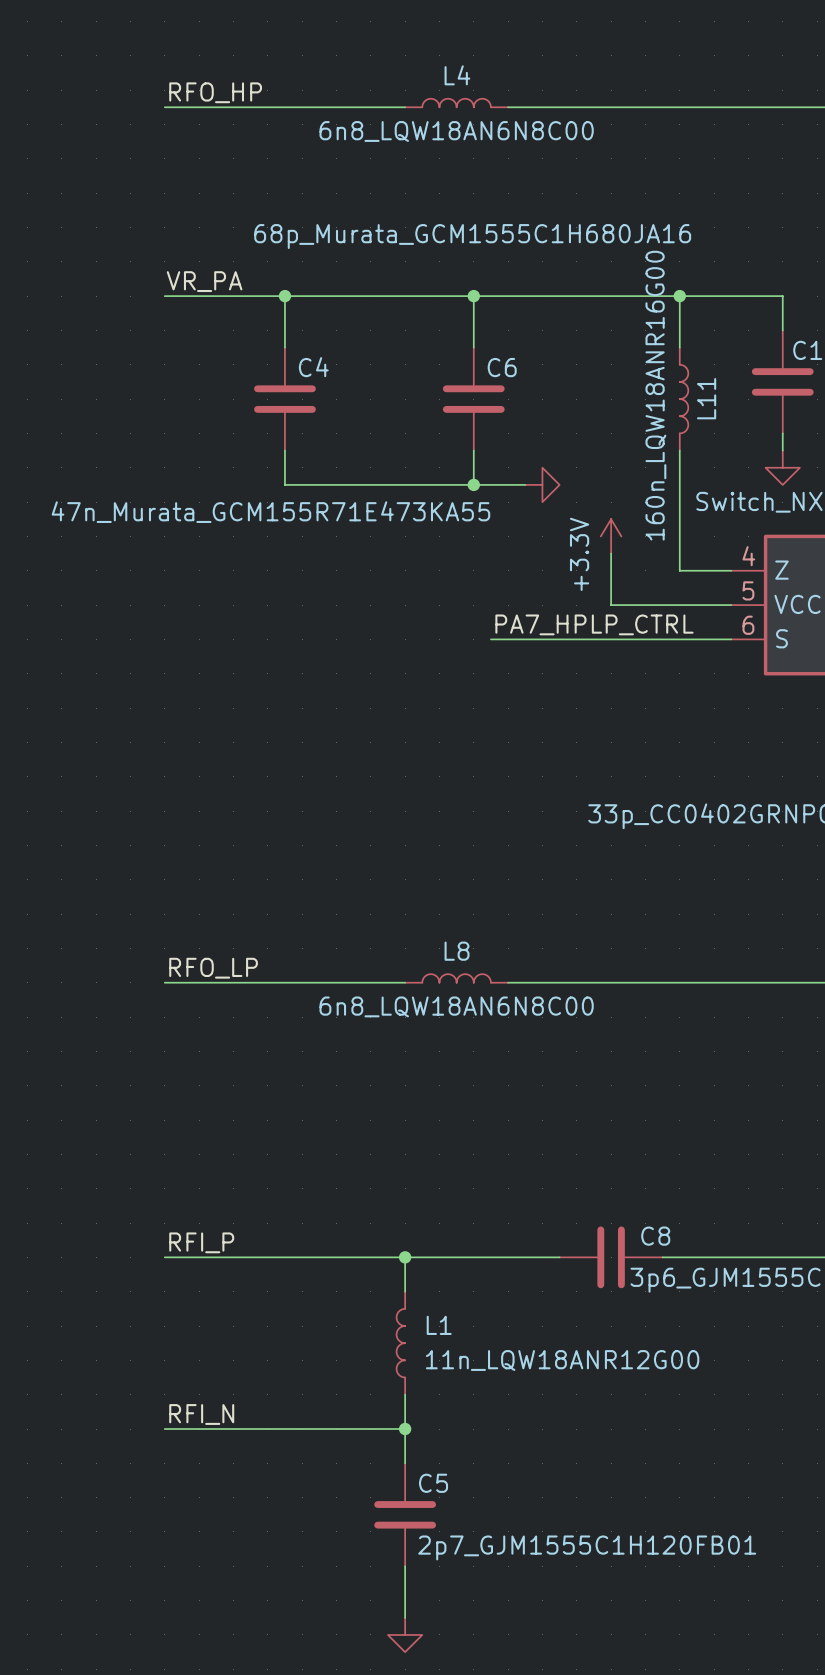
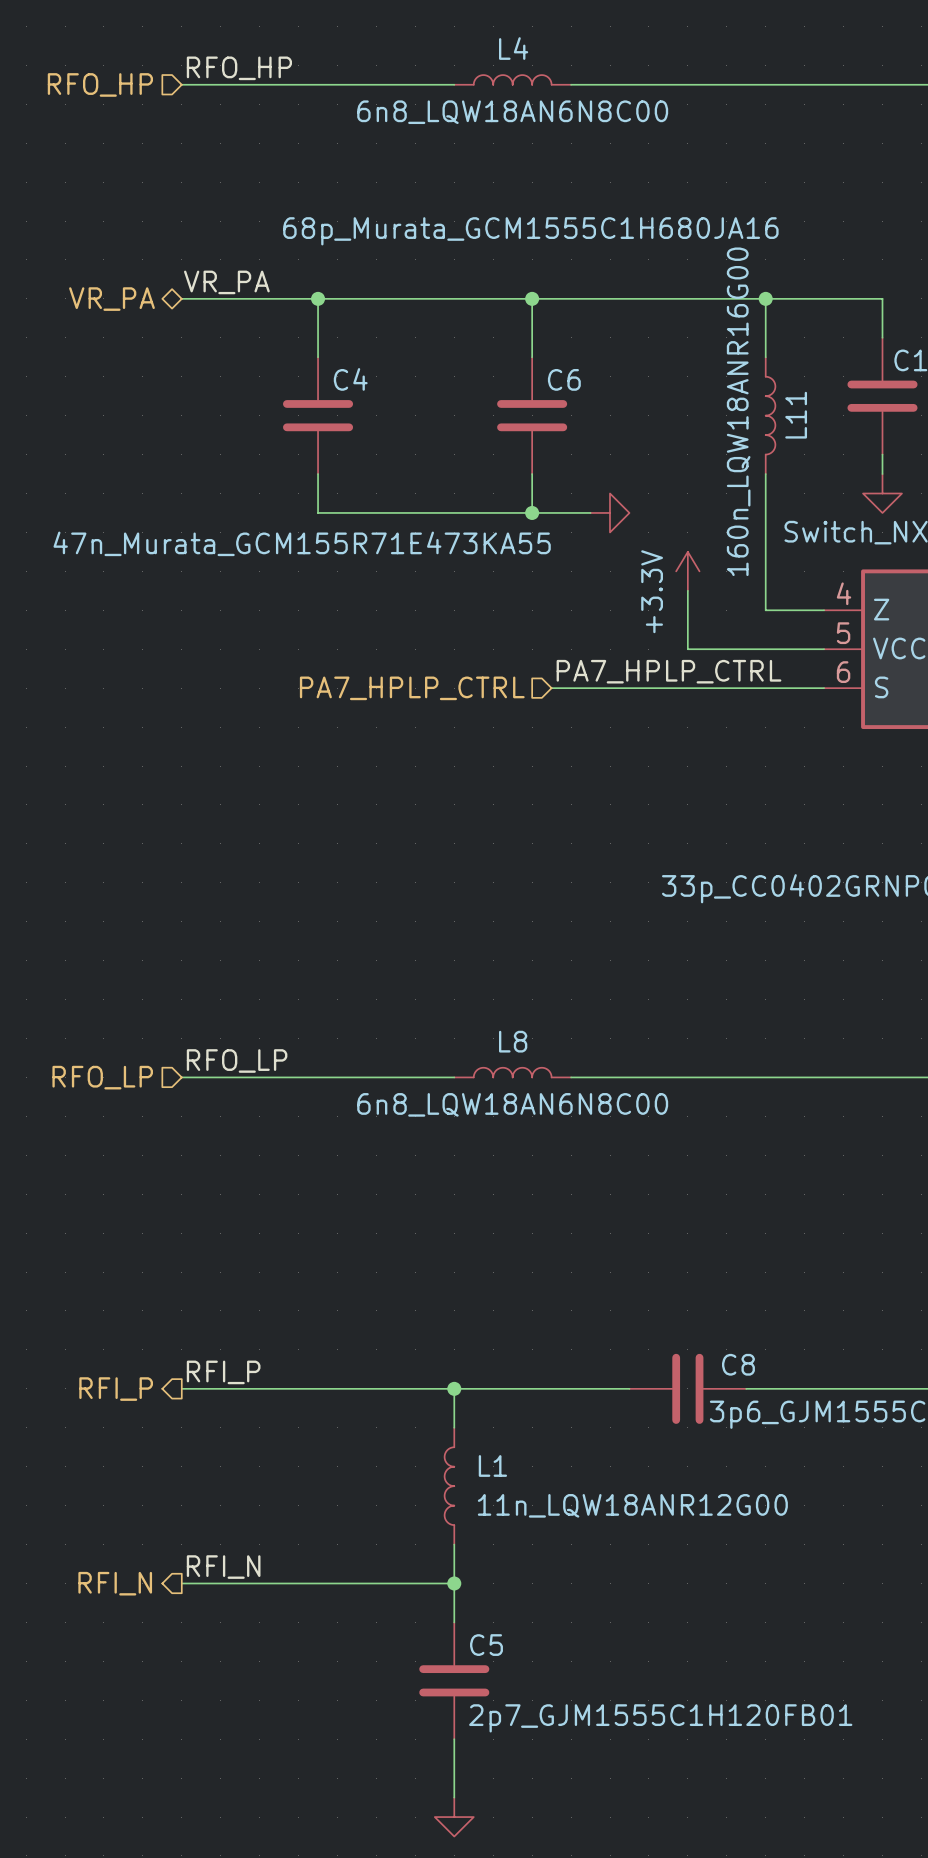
hierarchical label: none -> RFO_HP (100, 84)
hierarchical label: none -> VR_PA (111, 299)
hierarchical label: none -> PA7_HPLP_CTRL (412, 688)
hierarchical label: none -> RFO_LP (102, 1077)
hierarchical label: none -> RFI_P (116, 1389)
hierarchical label: none -> RFI_N (115, 1583)

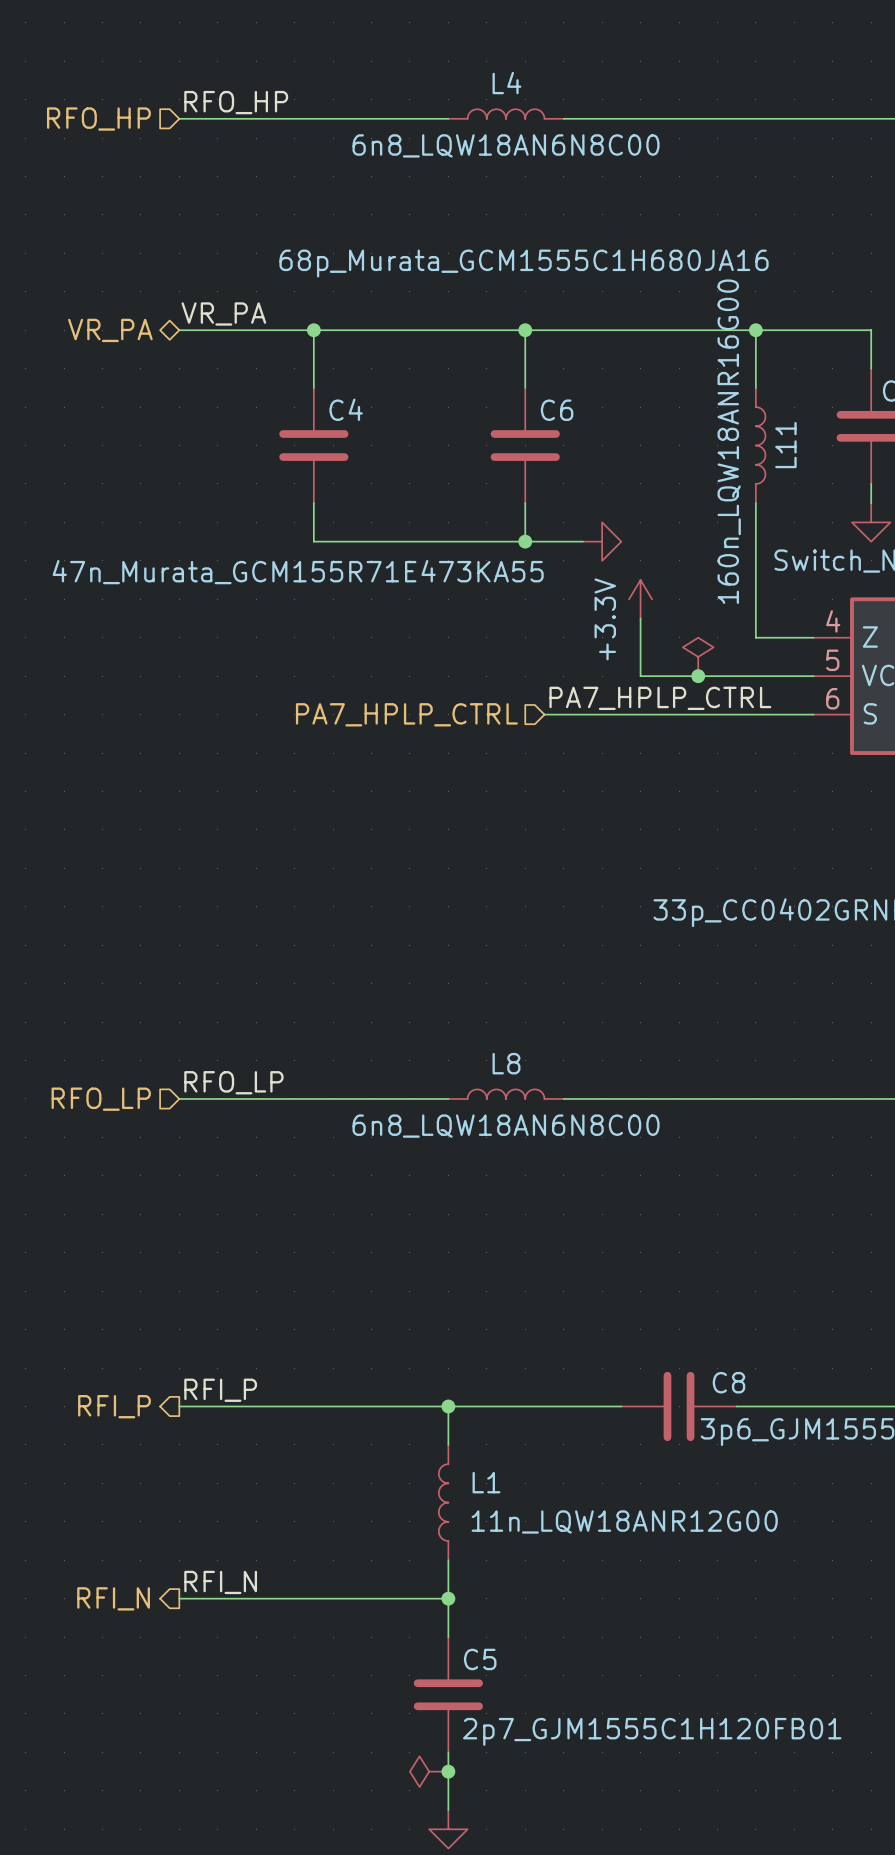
power symbol position: +3.3V (687, 571) -> +3.3V (640, 599)
wire: (687, 590) (687, 649) -> (640, 618) (640, 676) (679, 676)
power symbol: none -> (698, 656)
junction: none -> (698, 676)
power symbol: none -> (429, 1771)
junction: none -> (448, 1771)

